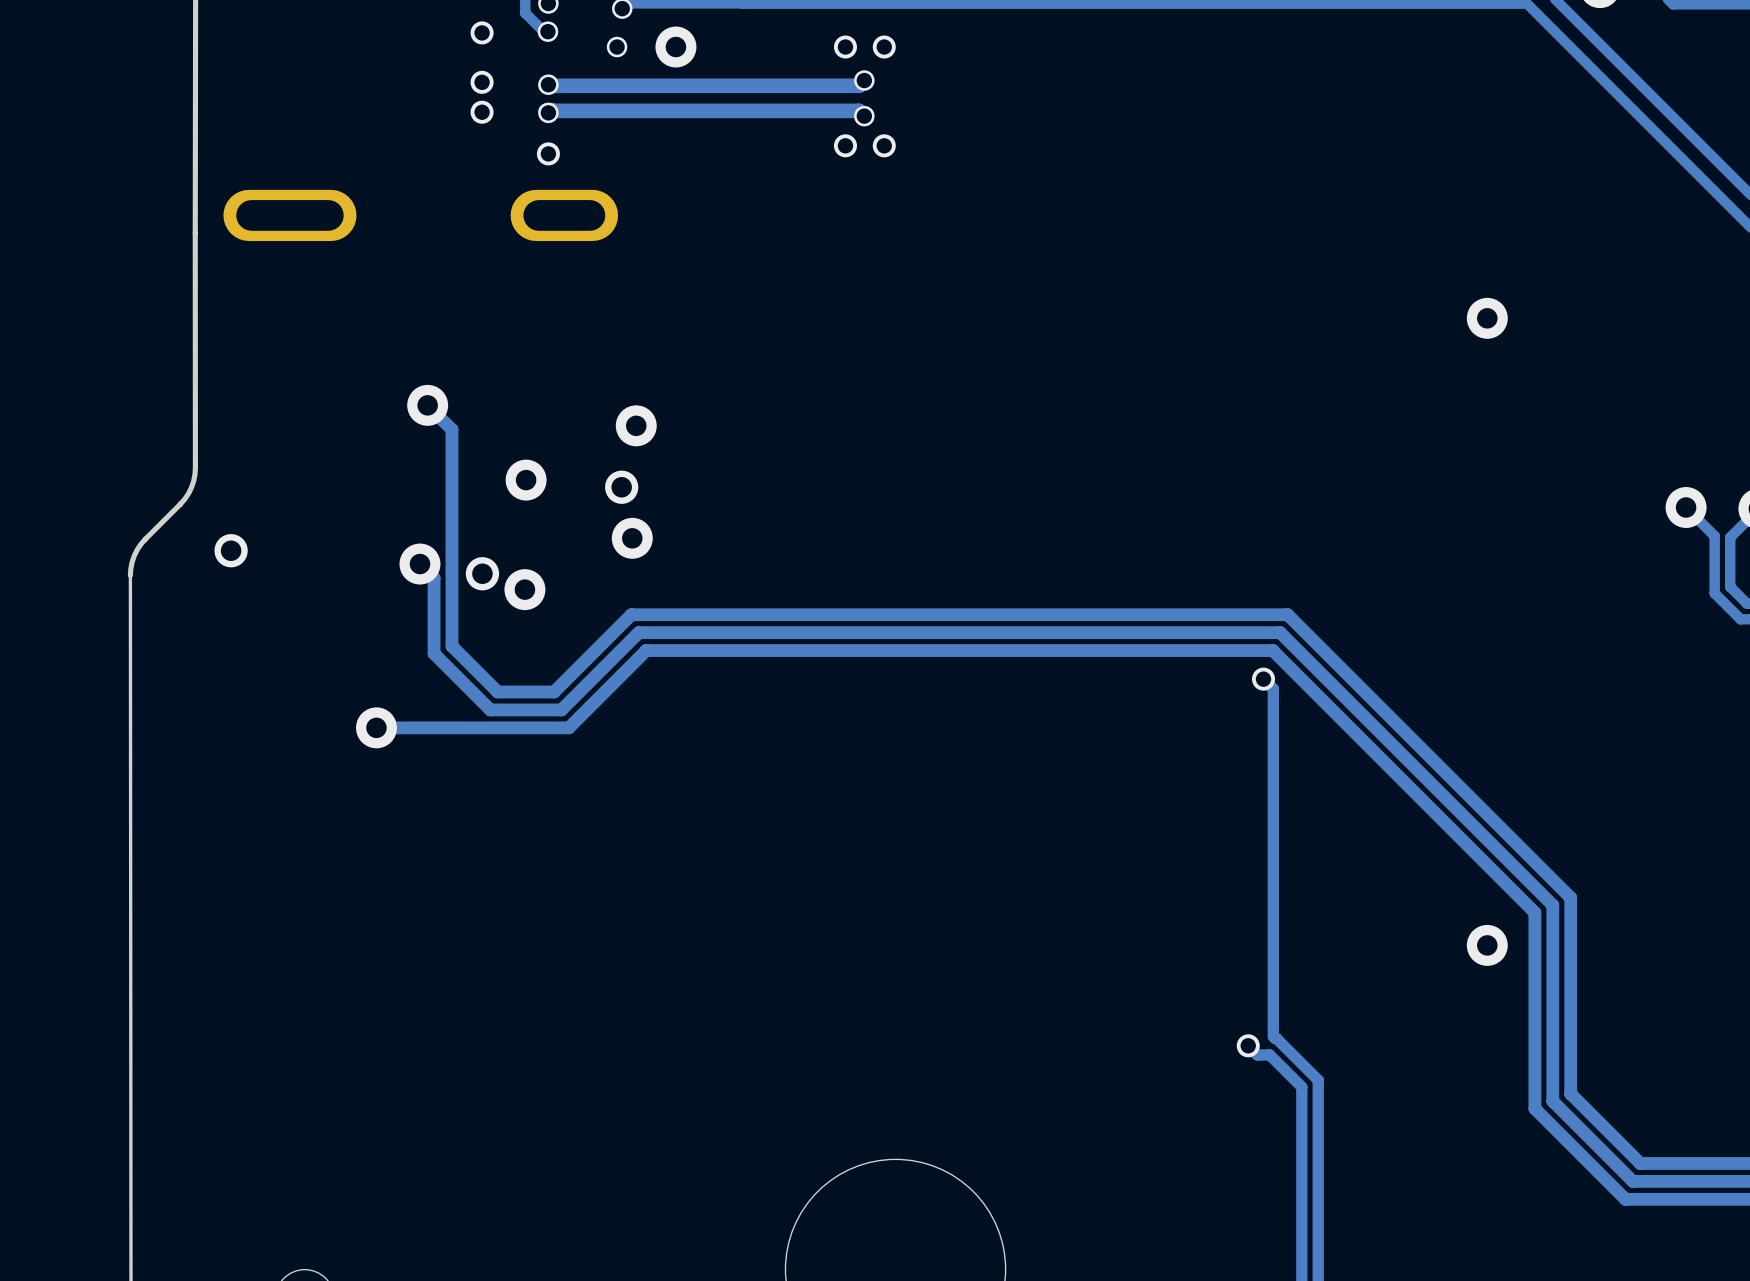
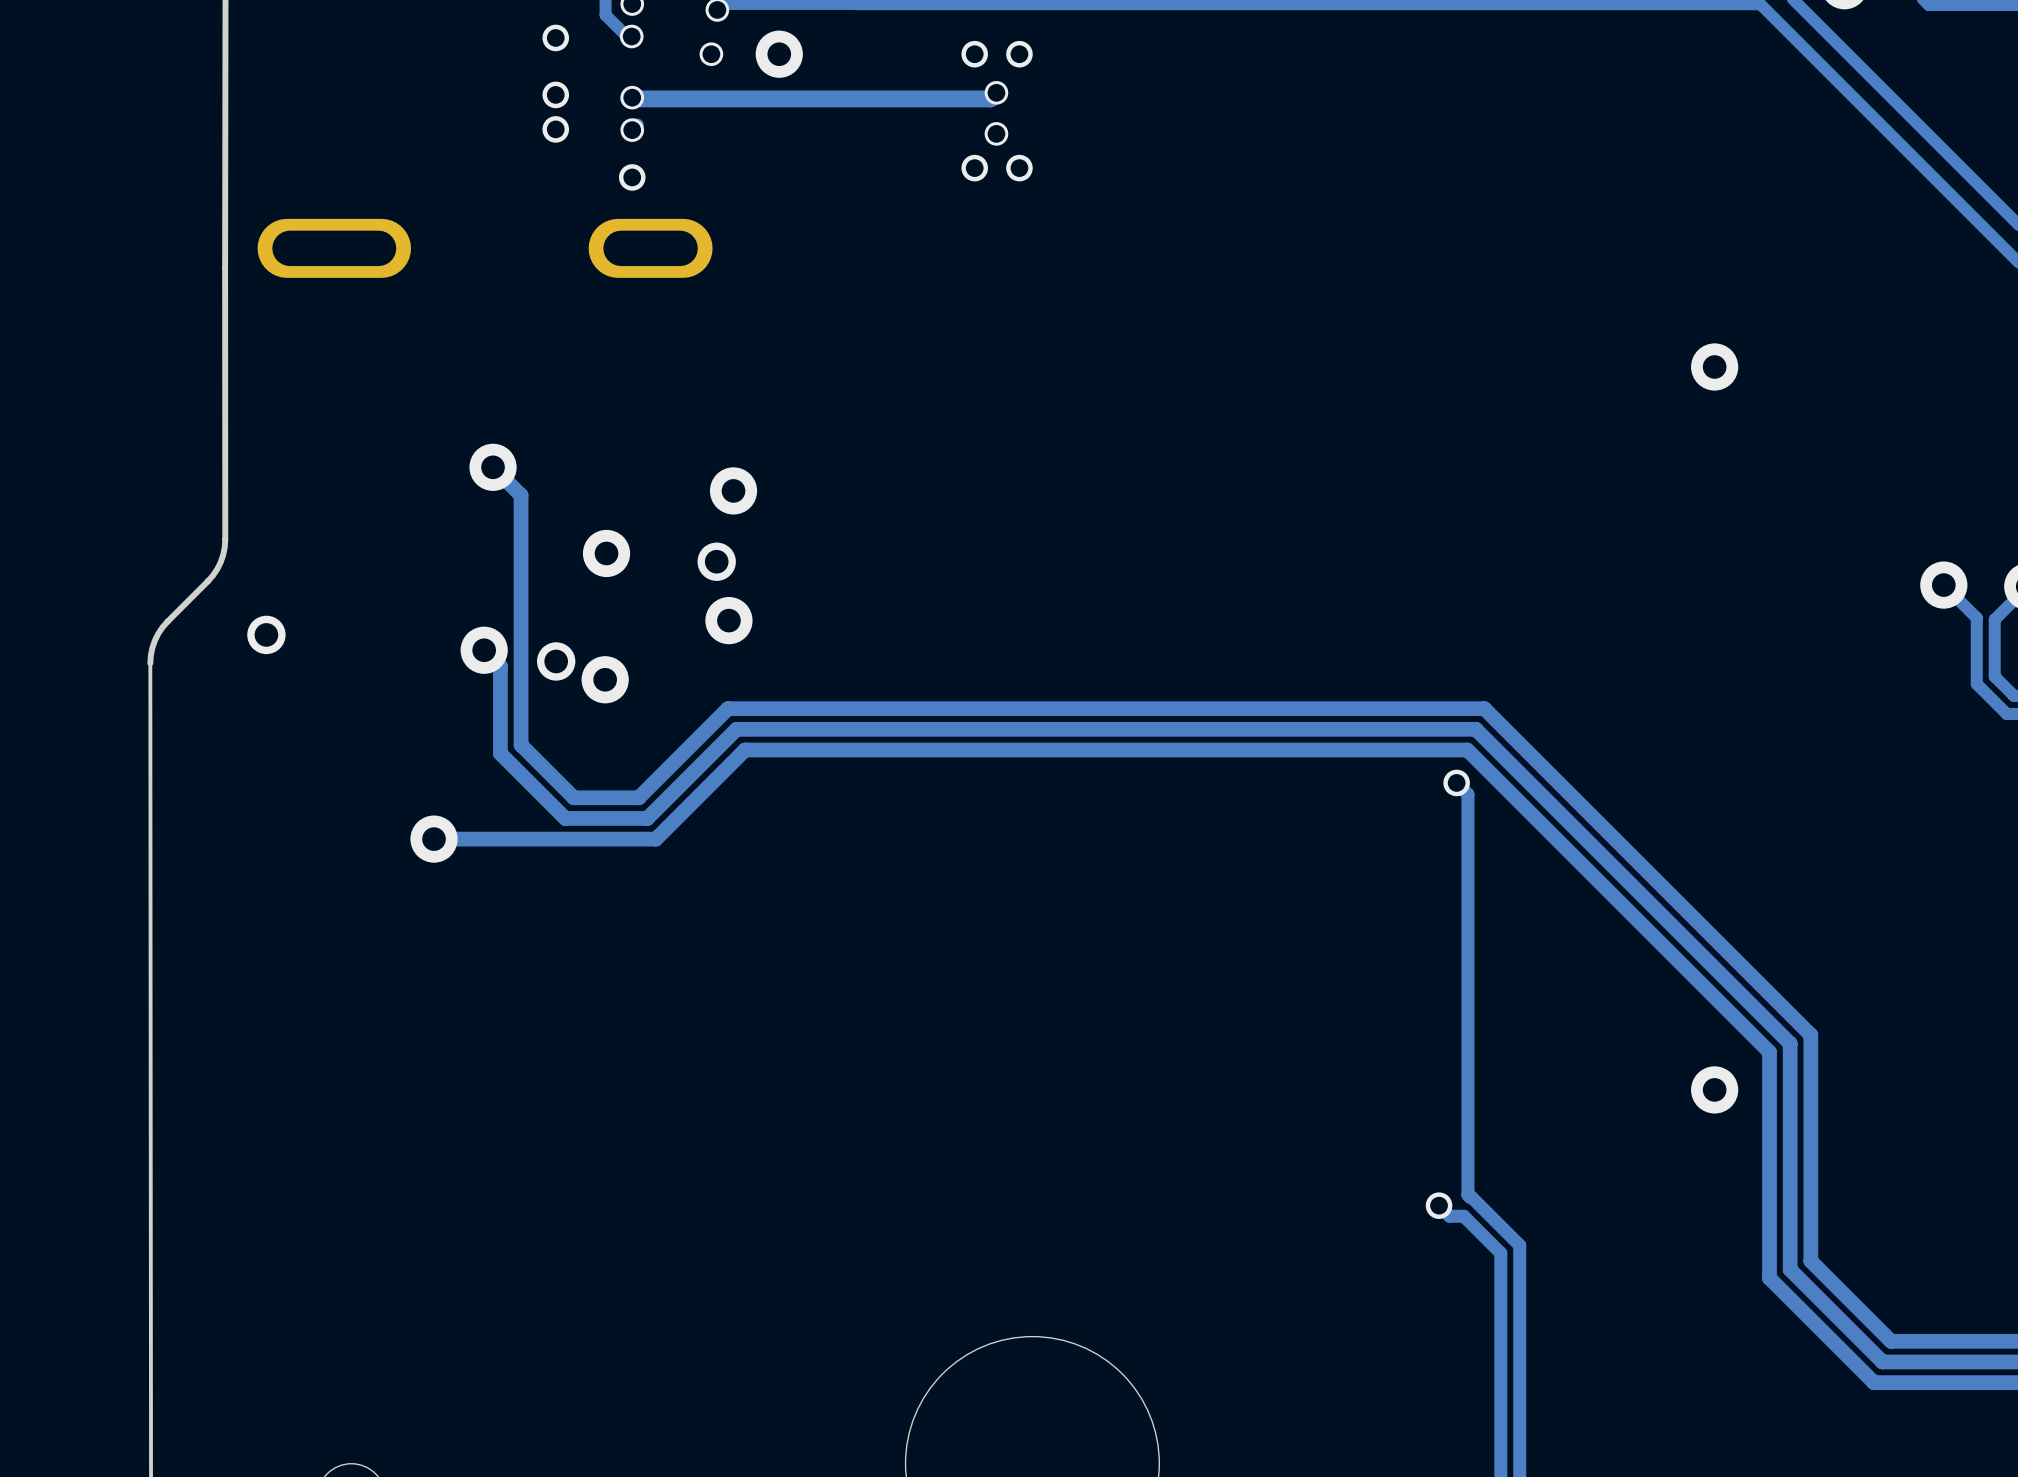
track: (545, 110) (859, 110) (864, 116) -> none

